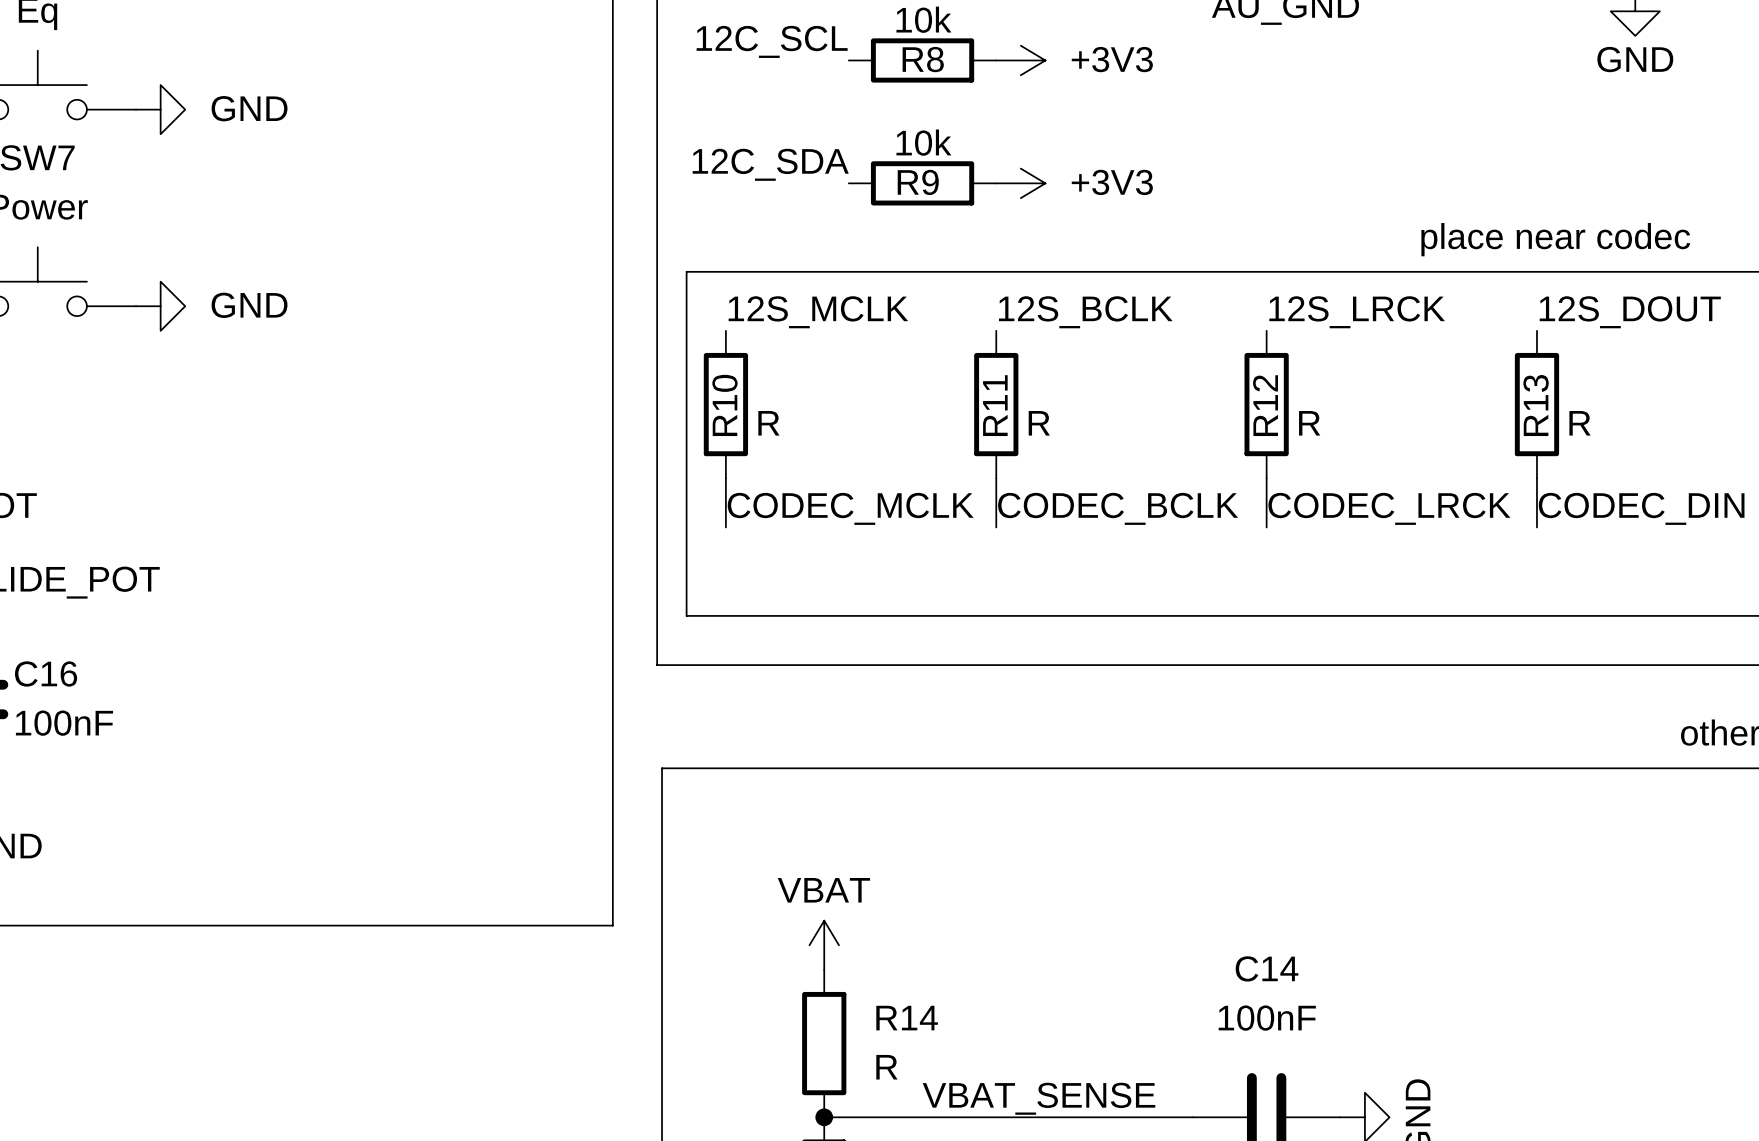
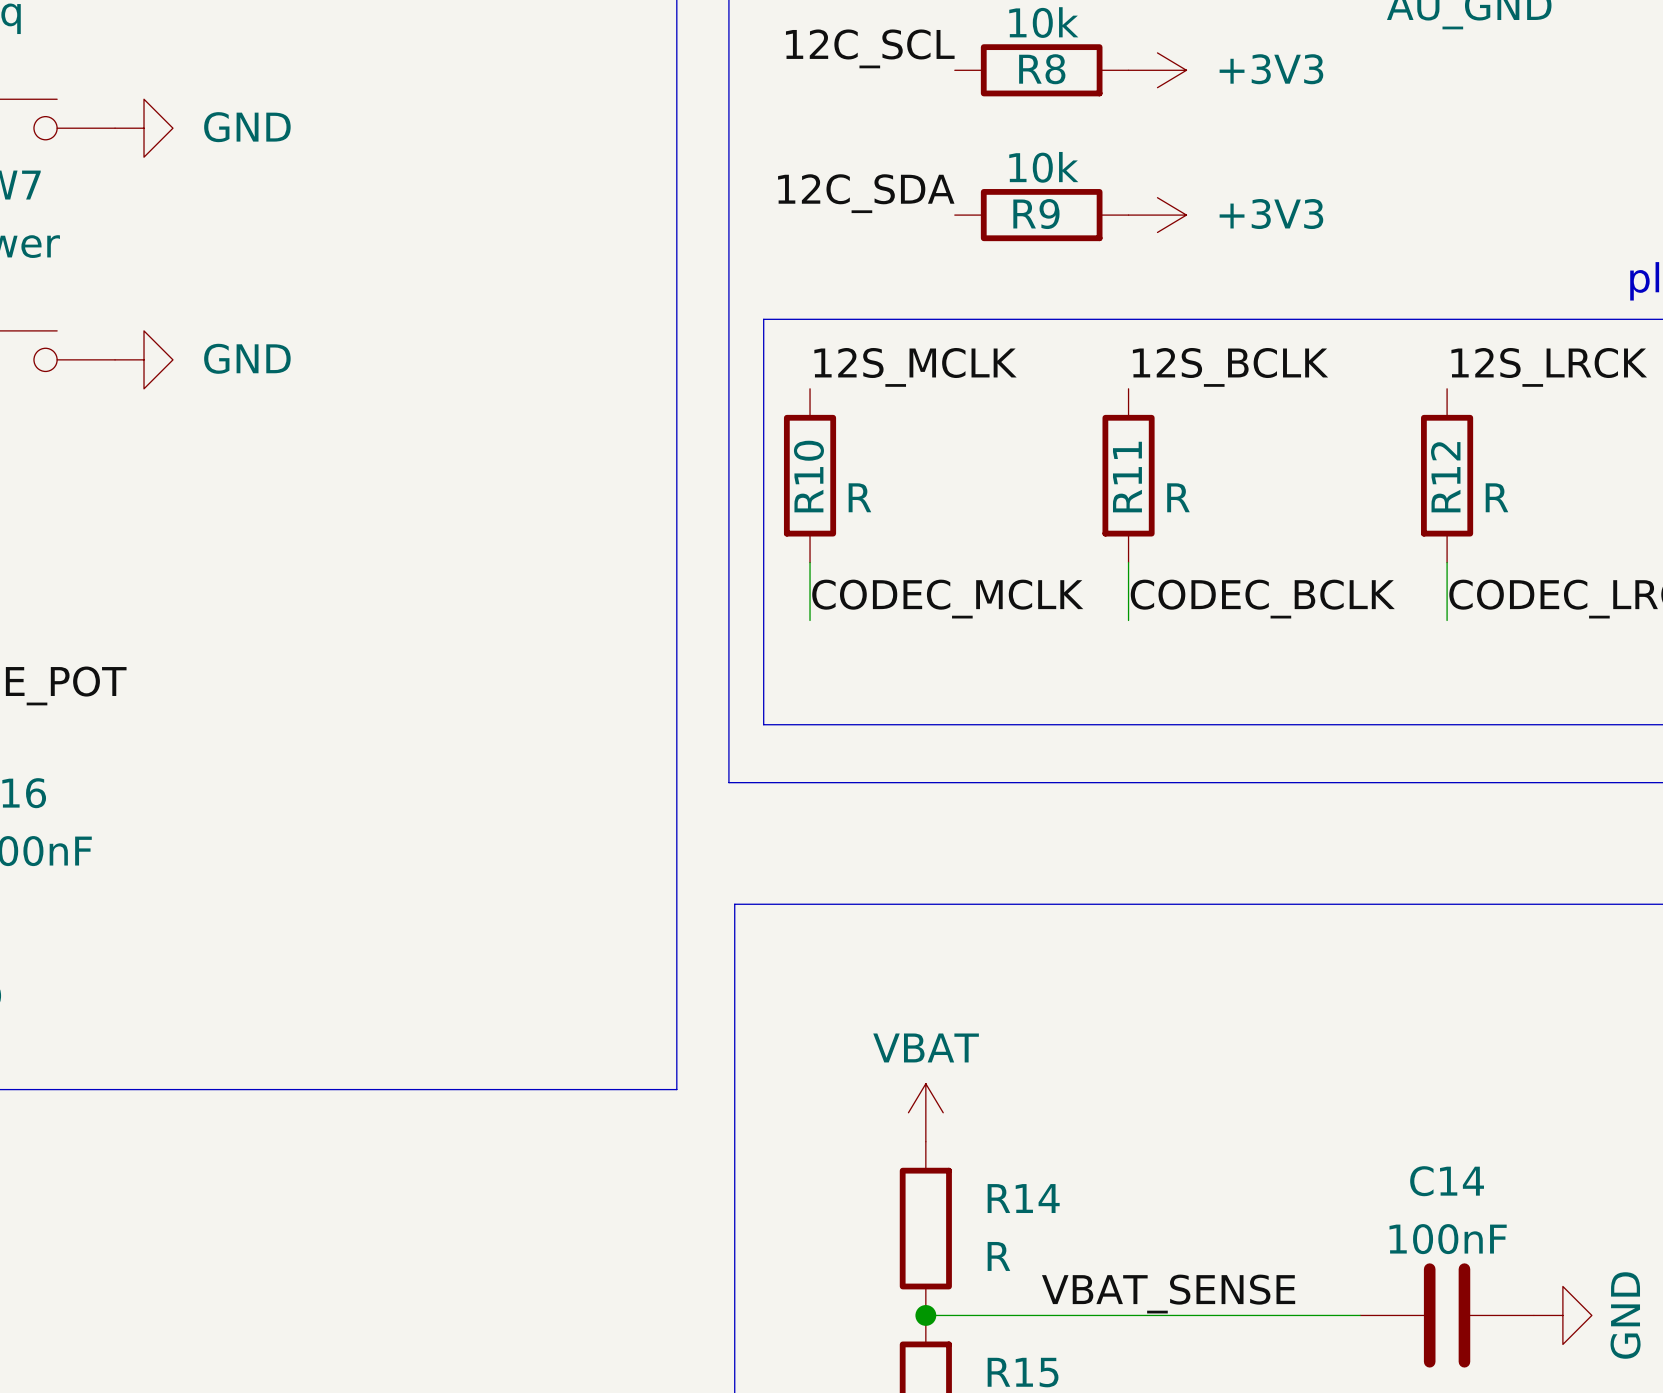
C14 name position: C14 (1267, 968) -> C14 (1447, 1181)
C14 value position: 100nF (1267, 1018) -> 100nF (1448, 1239)

